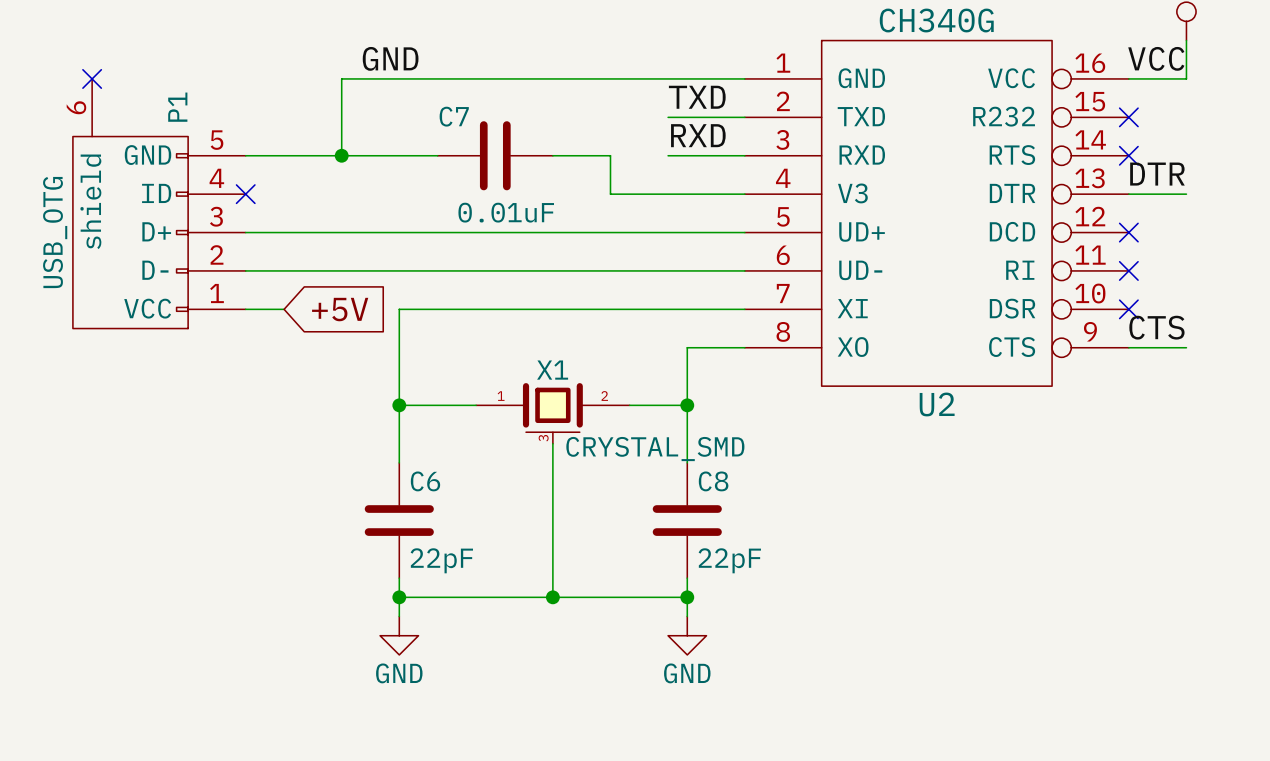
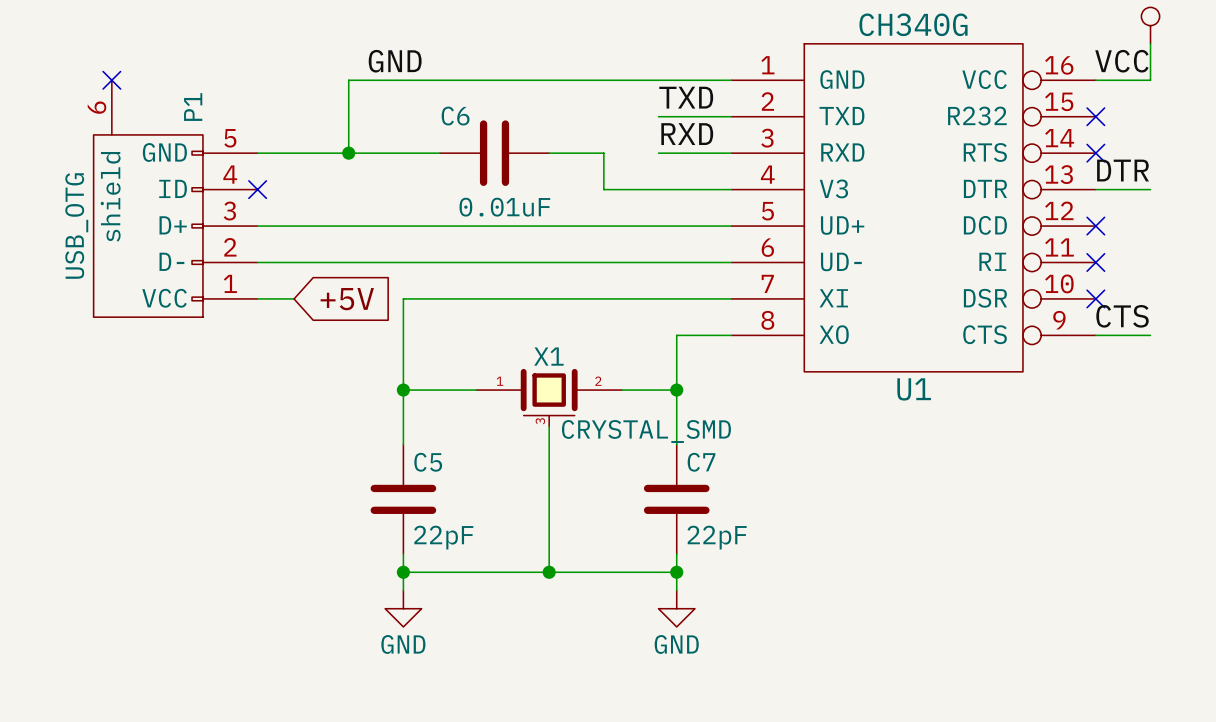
C7 name: C7 (454, 116) -> C6 (455, 116)
U2 name: U2 (937, 404) -> U1 (914, 389)
C6 name: C6 (425, 481) -> C5 (428, 462)
C8 name: C8 (713, 481) -> C7 (701, 462)

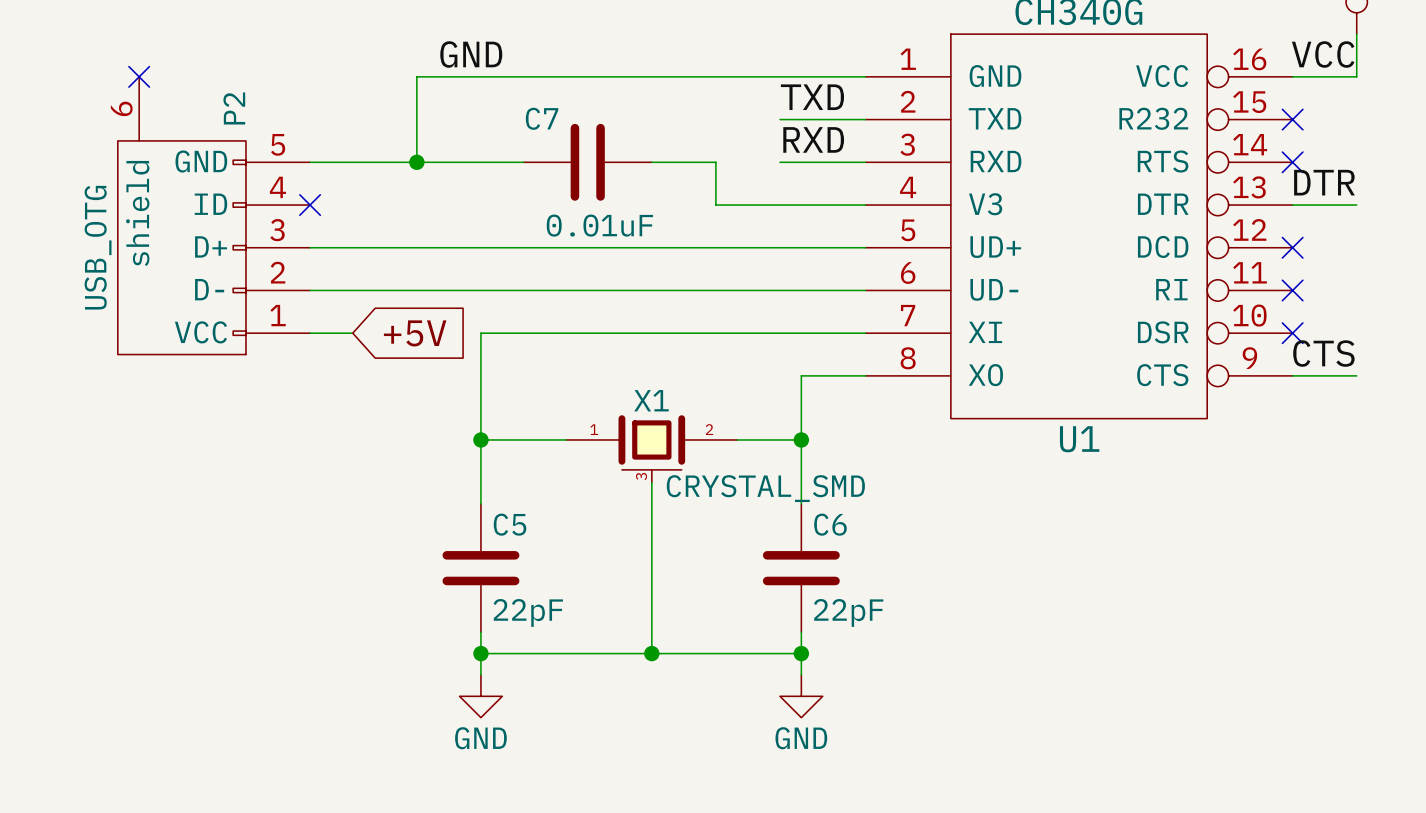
P1 name: P1 (193, 107) -> P2 (234, 108)
C6 name: C6 (455, 116) -> C7 (542, 118)
C7 name: C7 (701, 462) -> C6 (830, 524)

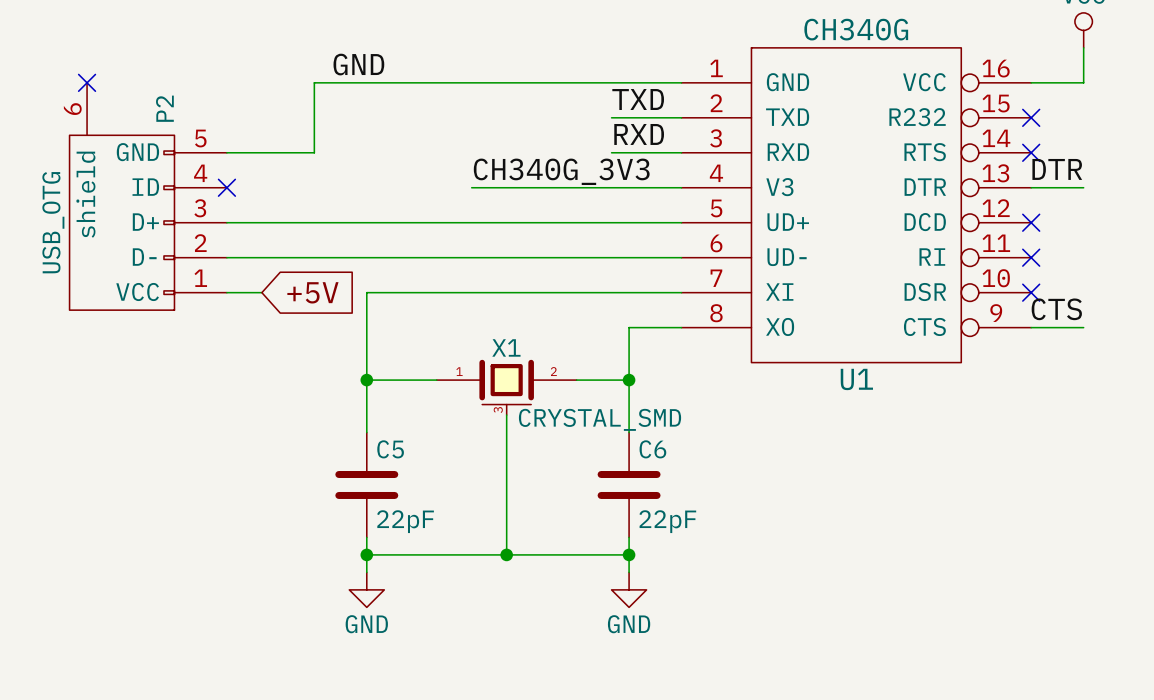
label: VCC (1323, 54) -> none
wire: (416, 162) (523, 162) -> none
junction: (416, 162) -> none
C7: 0.01uF (587, 162) -> none
wire: (651, 162) (715, 162) (715, 205) -> (471, 187) (559, 187)
label: none -> CH340G_3V3 (561, 171)

